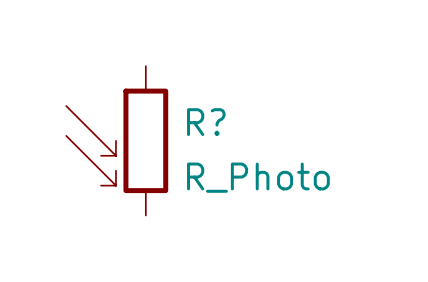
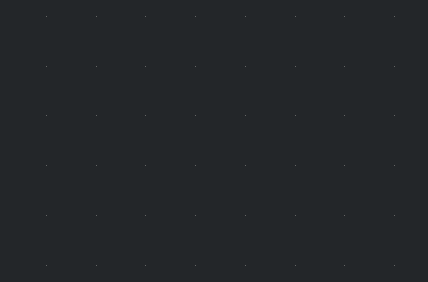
R?: R_Photo (117, 140) -> none

